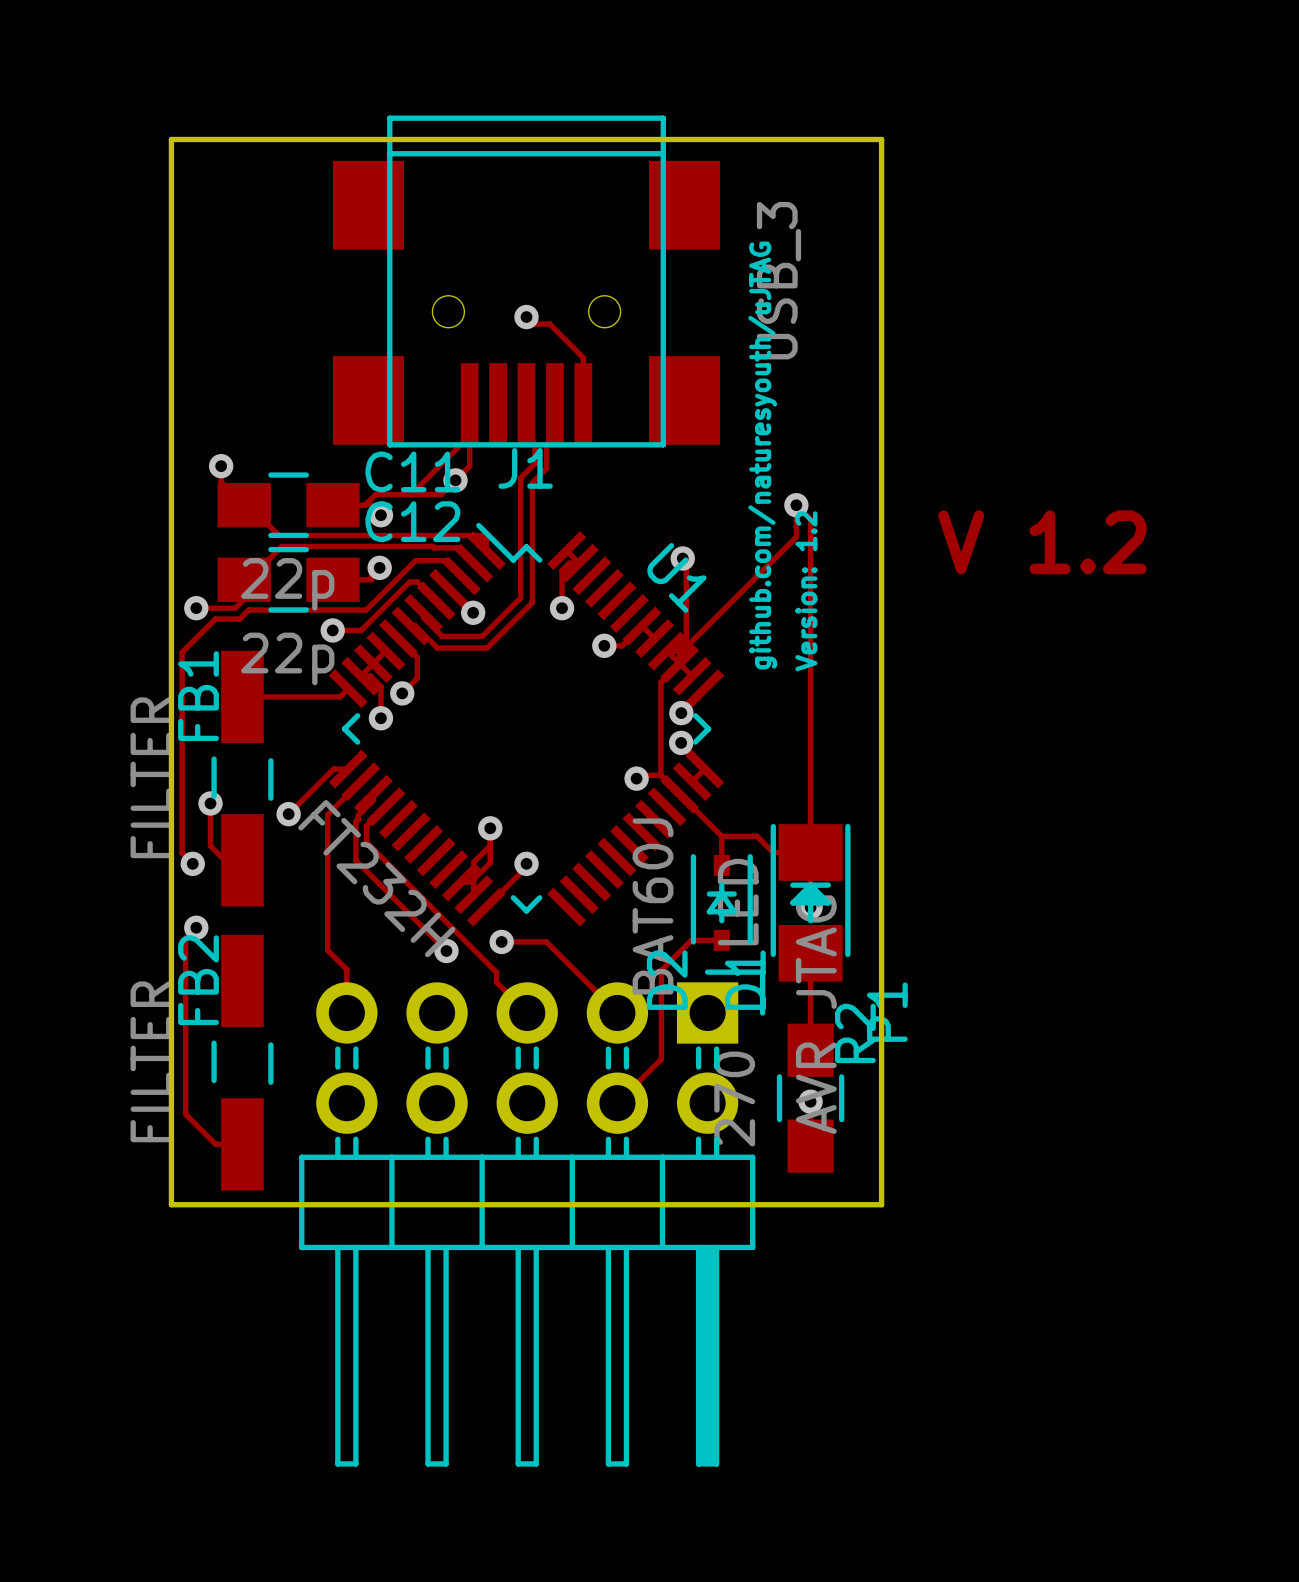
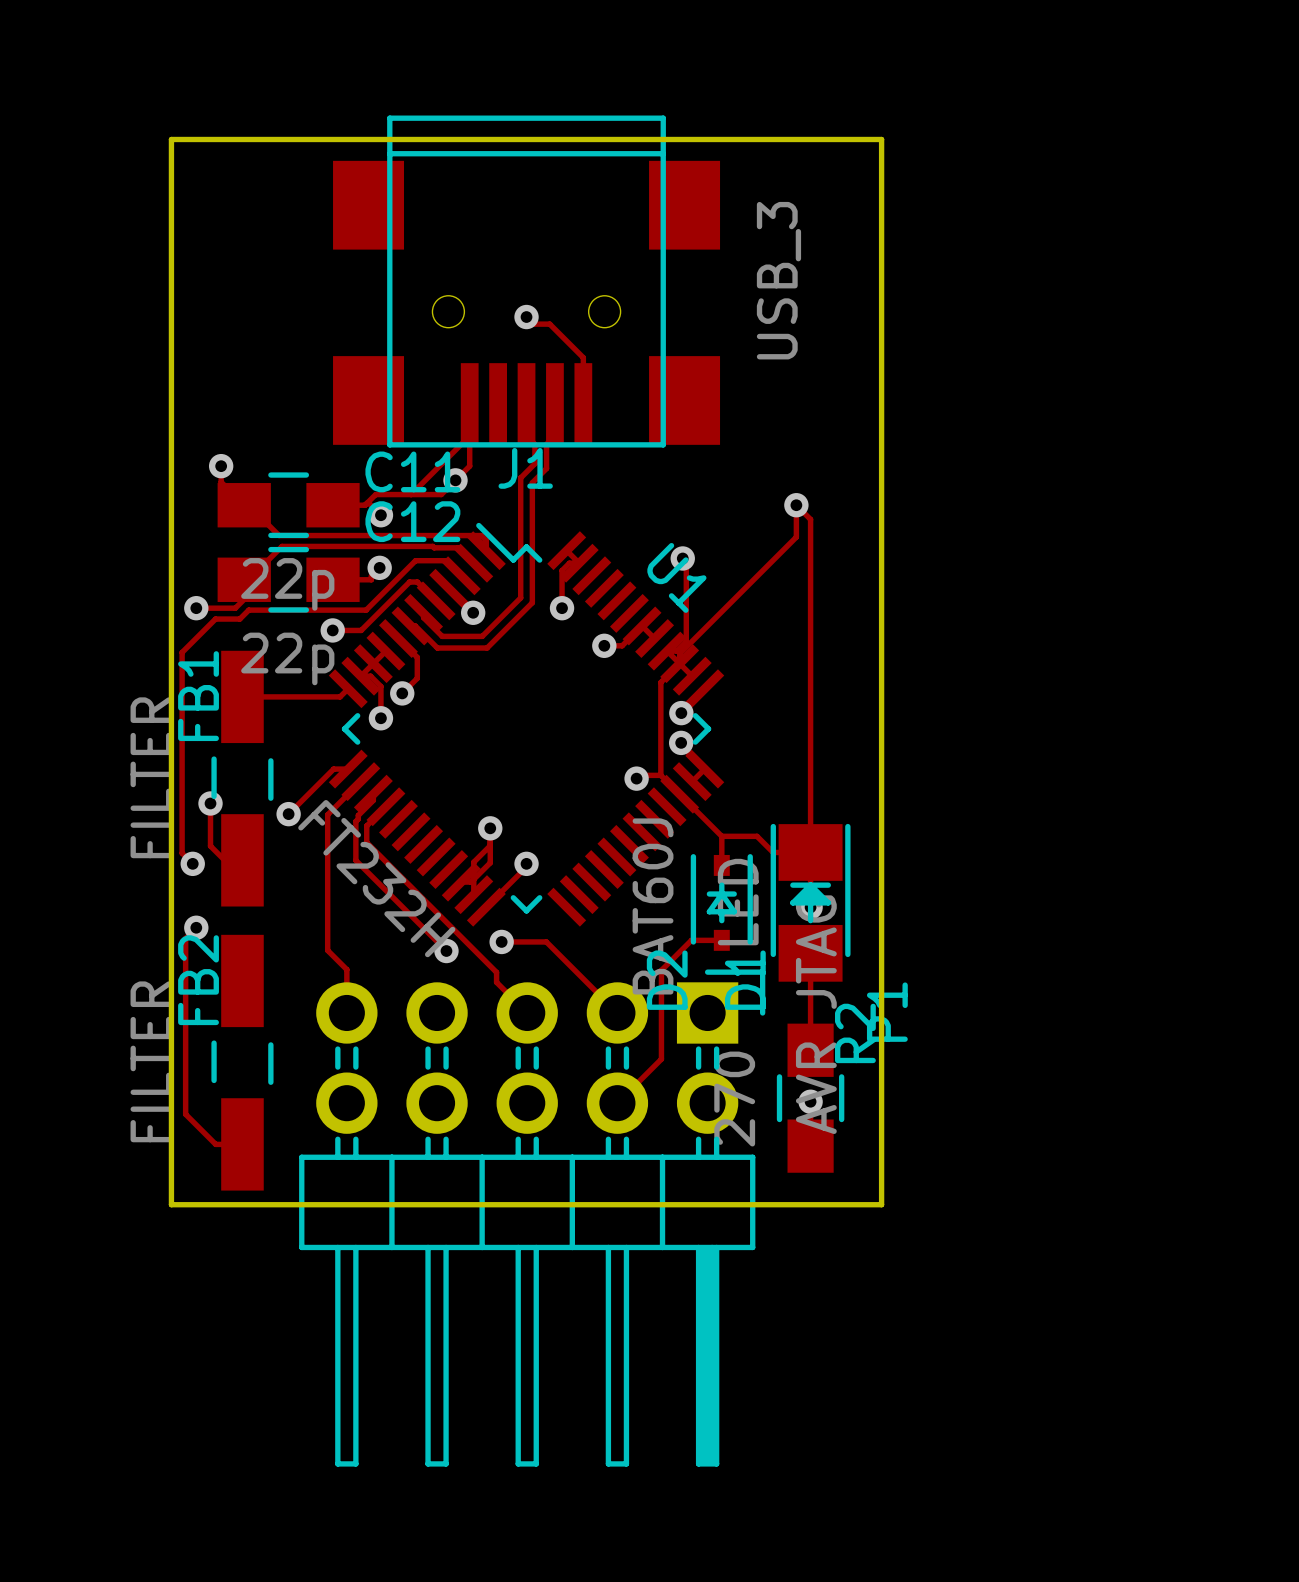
text: github.com/naturesyouth/uJTAG (762, 455) -> none
text: V 1.2 (1042, 542) -> none
text: Version: 1.2 (806, 591) -> none

